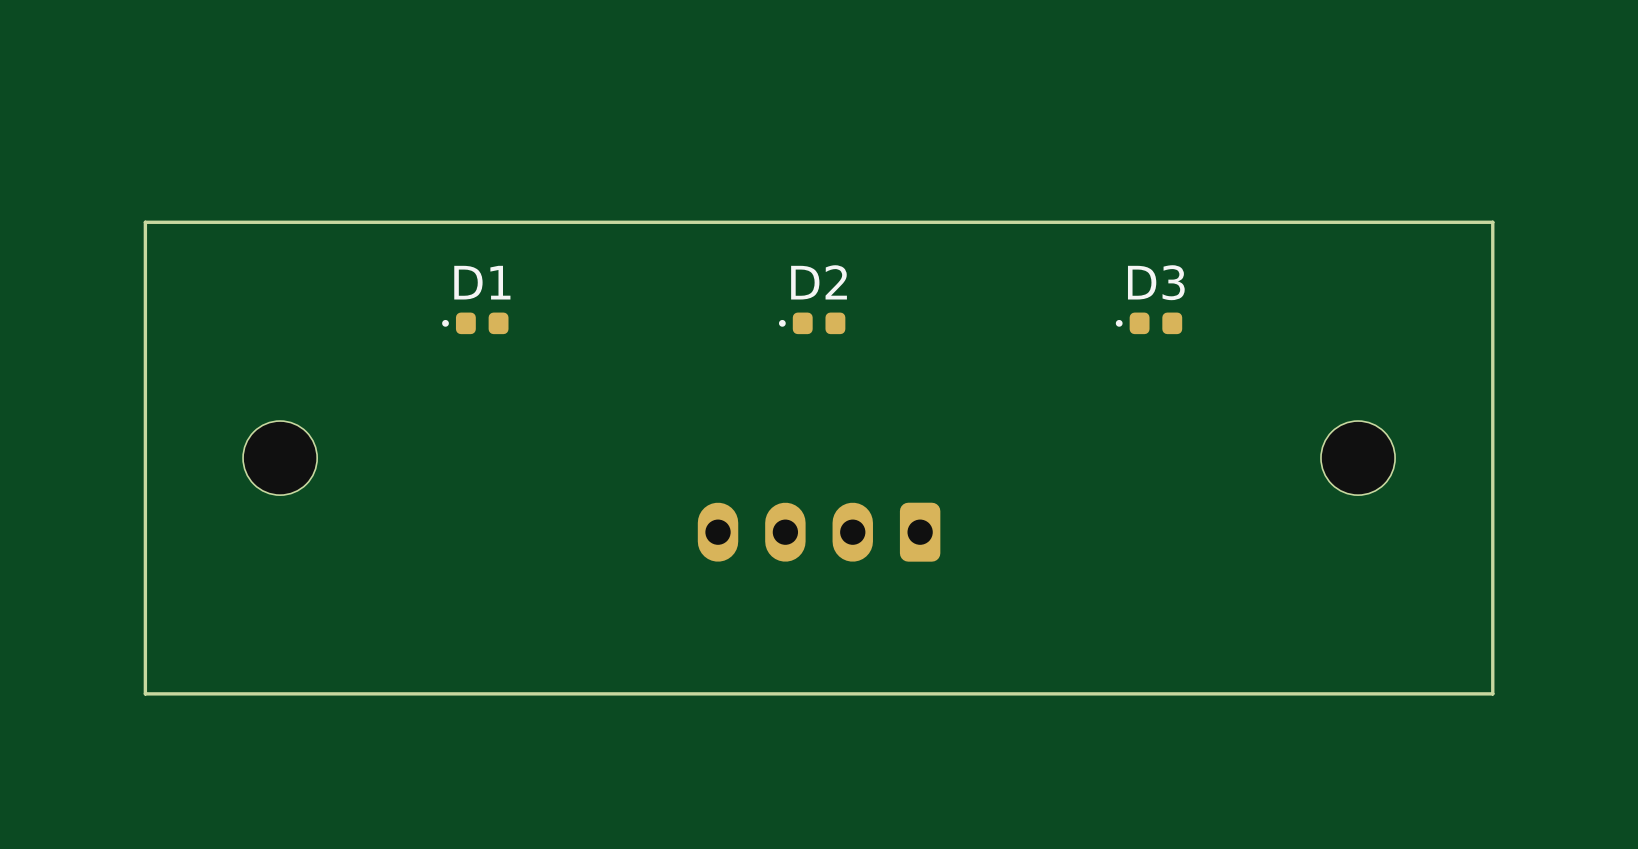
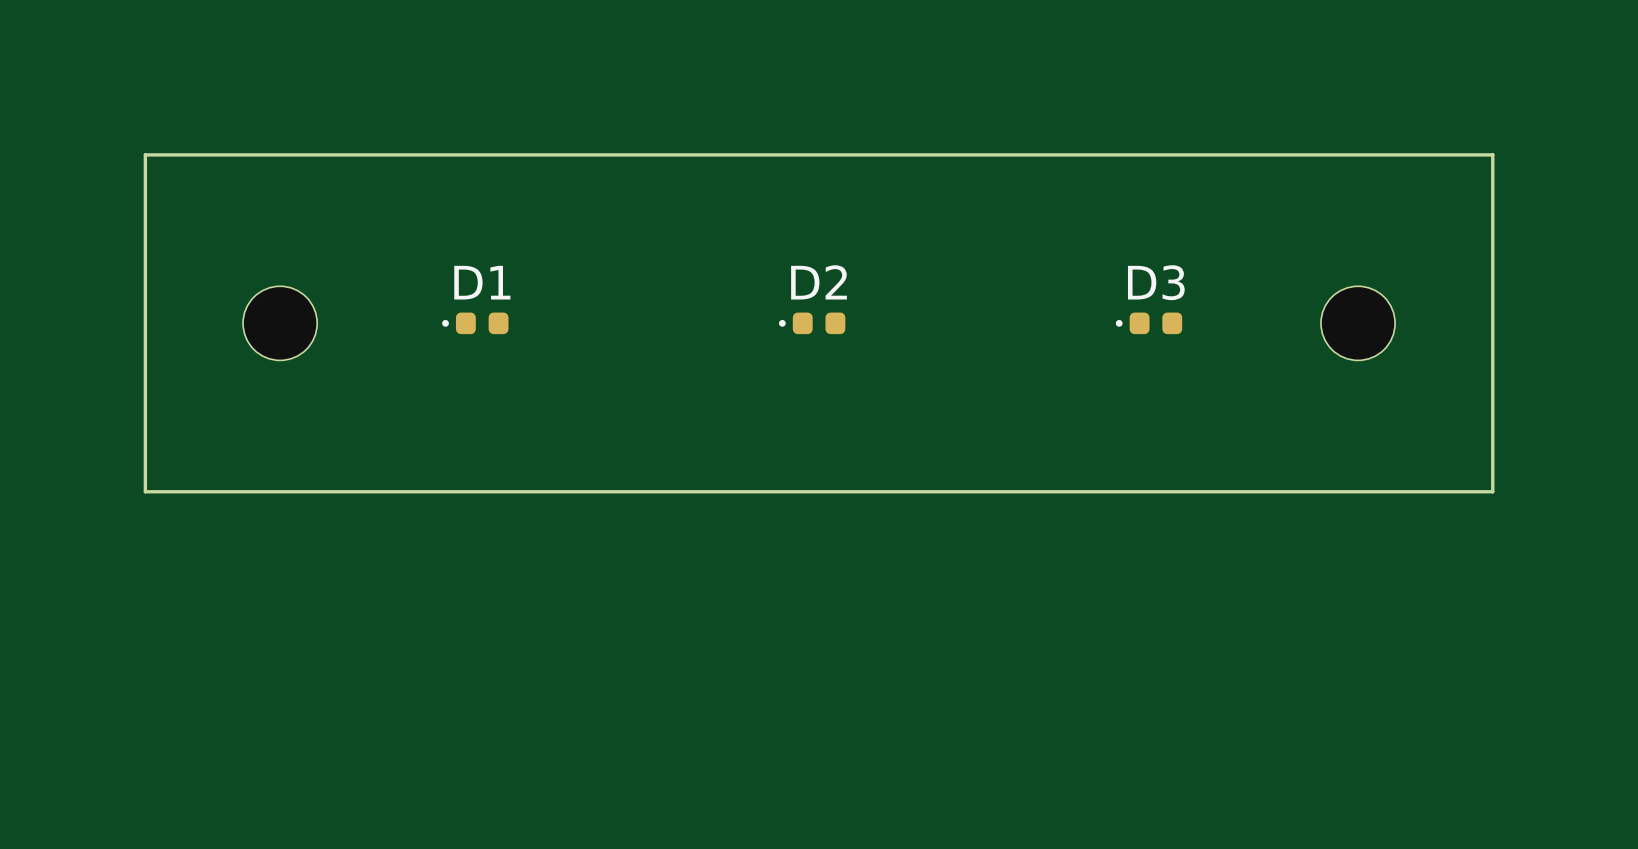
board edge: (145, 222) (1492, 222) -> (145, 222) (145, 154) (1492, 154) (1492, 222)
part position: (280, 458) -> (280, 323)
part position: (1358, 458) -> (1358, 323)
board edge: (145, 491) (145, 693) (1492, 693) (1492, 491) -> (145, 491) (1492, 491)
part: (819, 532) -> none

